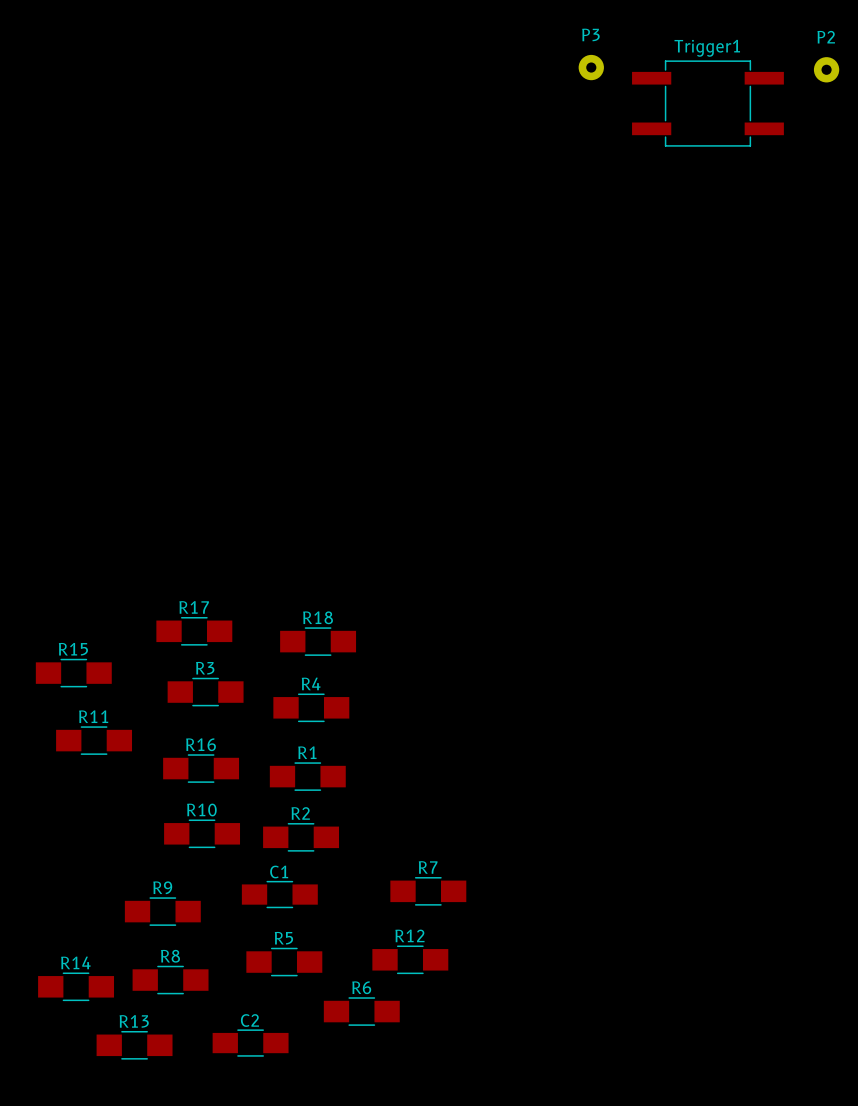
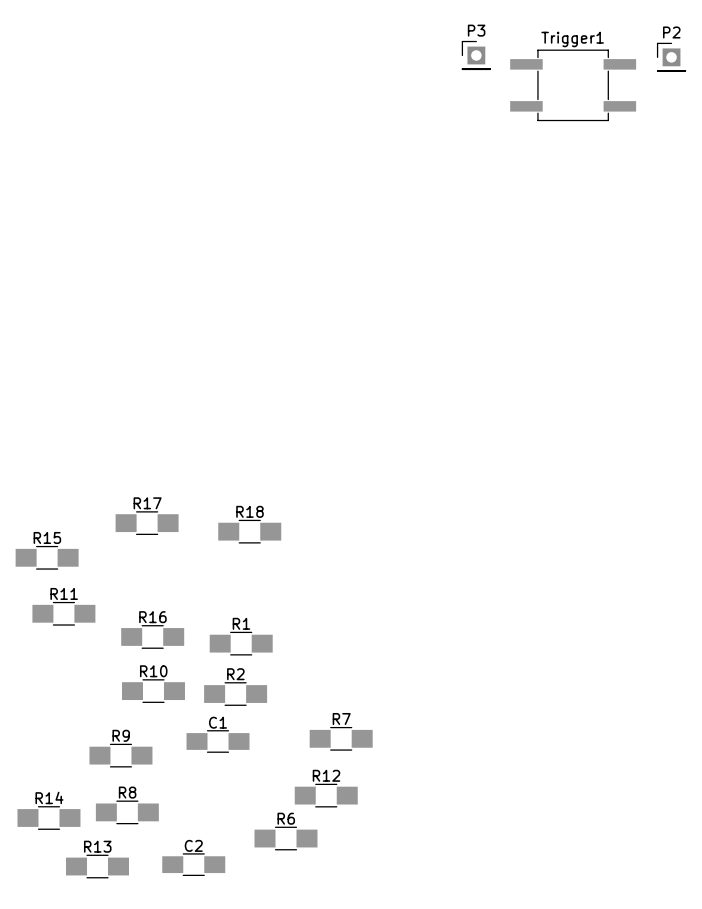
P3 footprint: [578, 54, 604, 81] -> [461, 40, 491, 71]
P2 footprint: [813, 57, 840, 83] -> [656, 42, 687, 72]
R3: (205, 692) -> none
R4: (311, 707) -> none
R5: (284, 962) -> none

